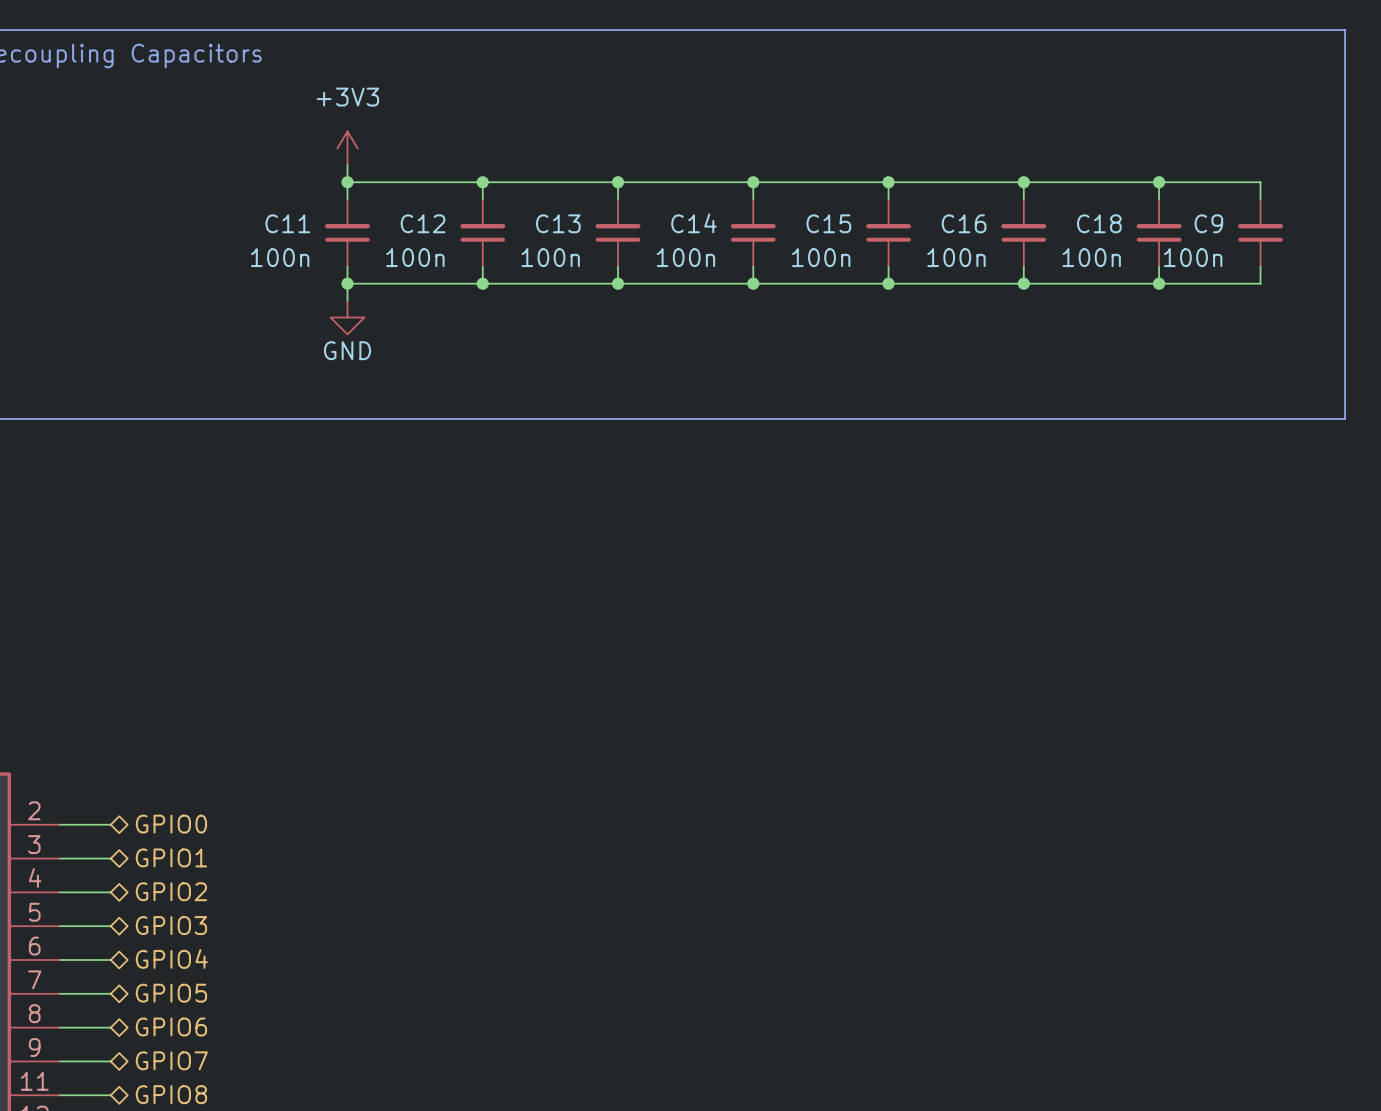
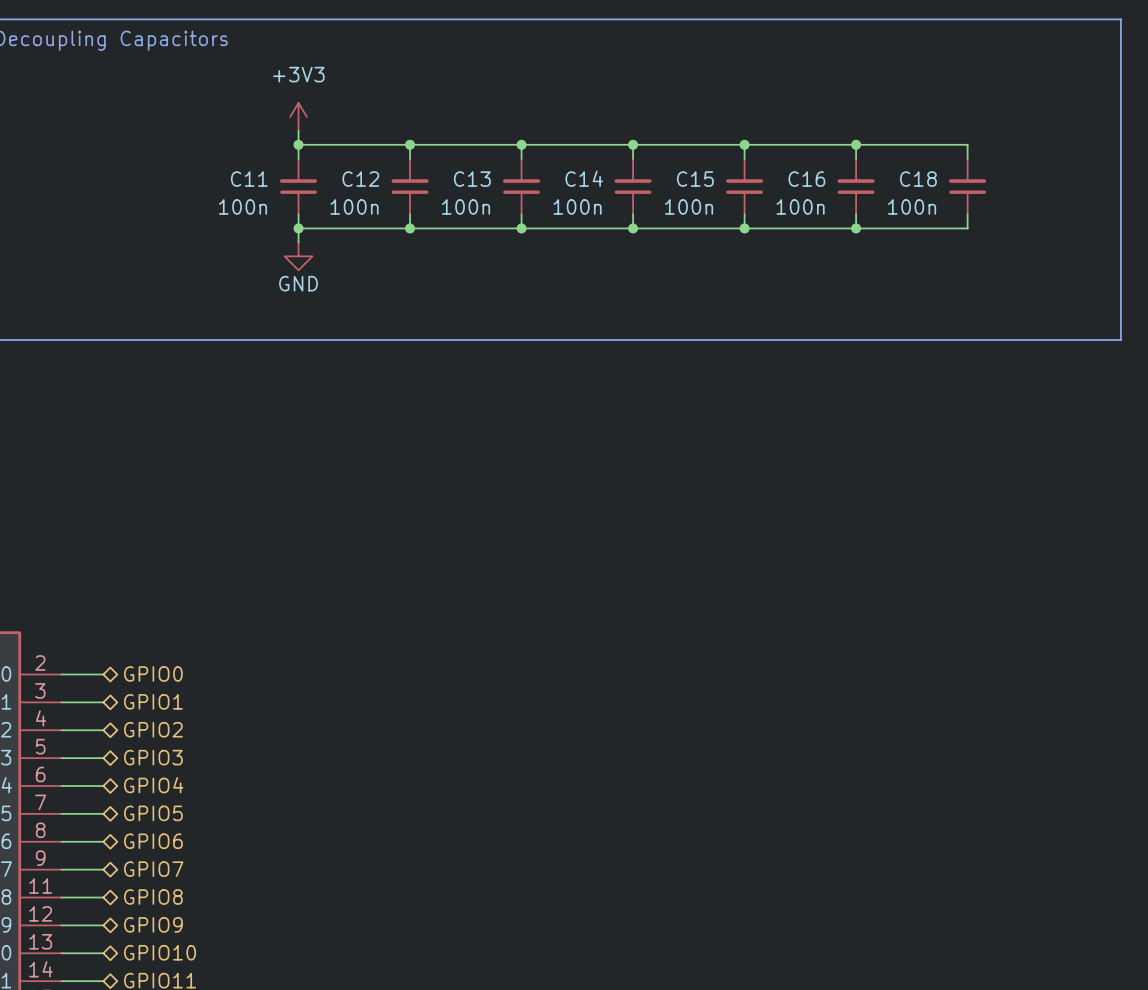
wire: (1159, 182) (1260, 182) (1260, 199) -> none
junction: (1159, 182) -> none
C9: 100n (1260, 232) -> none
wire: (1260, 266) (1260, 283) (1159, 283) -> none
junction: (1159, 283) -> none

